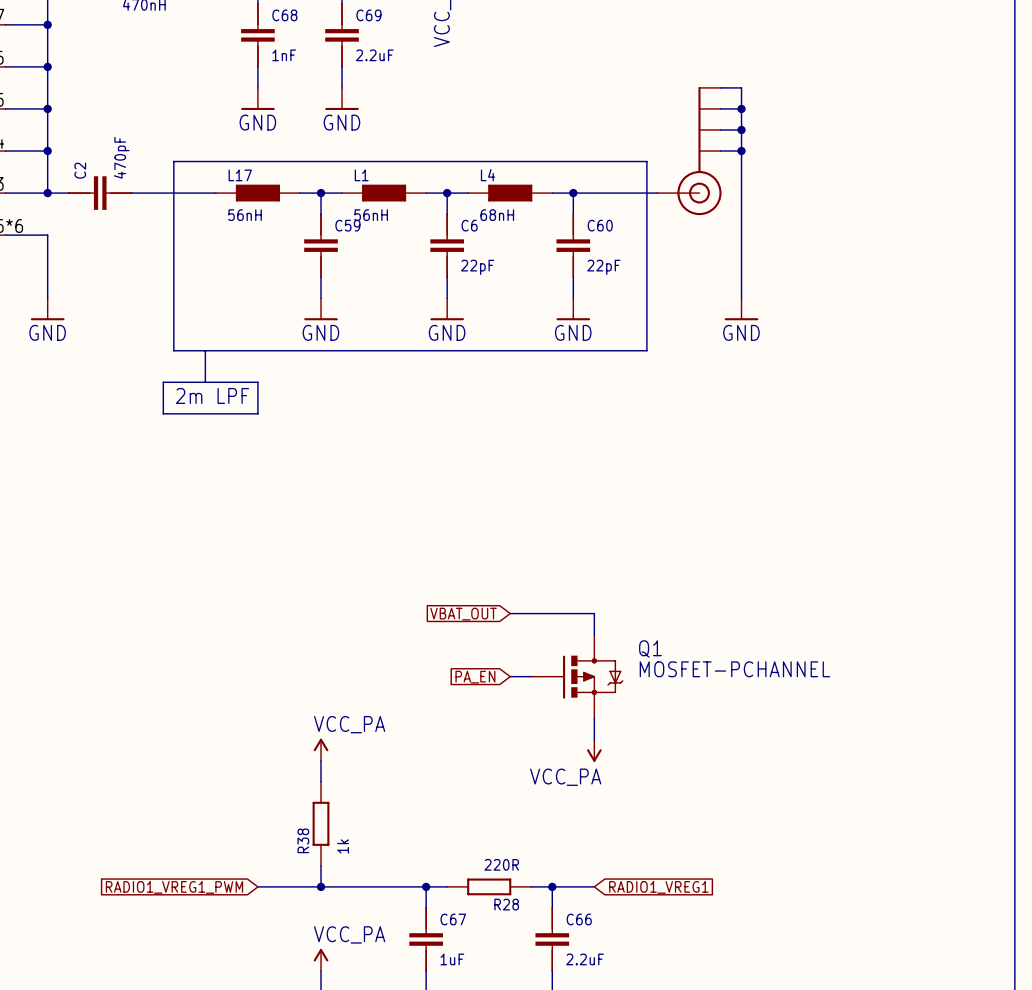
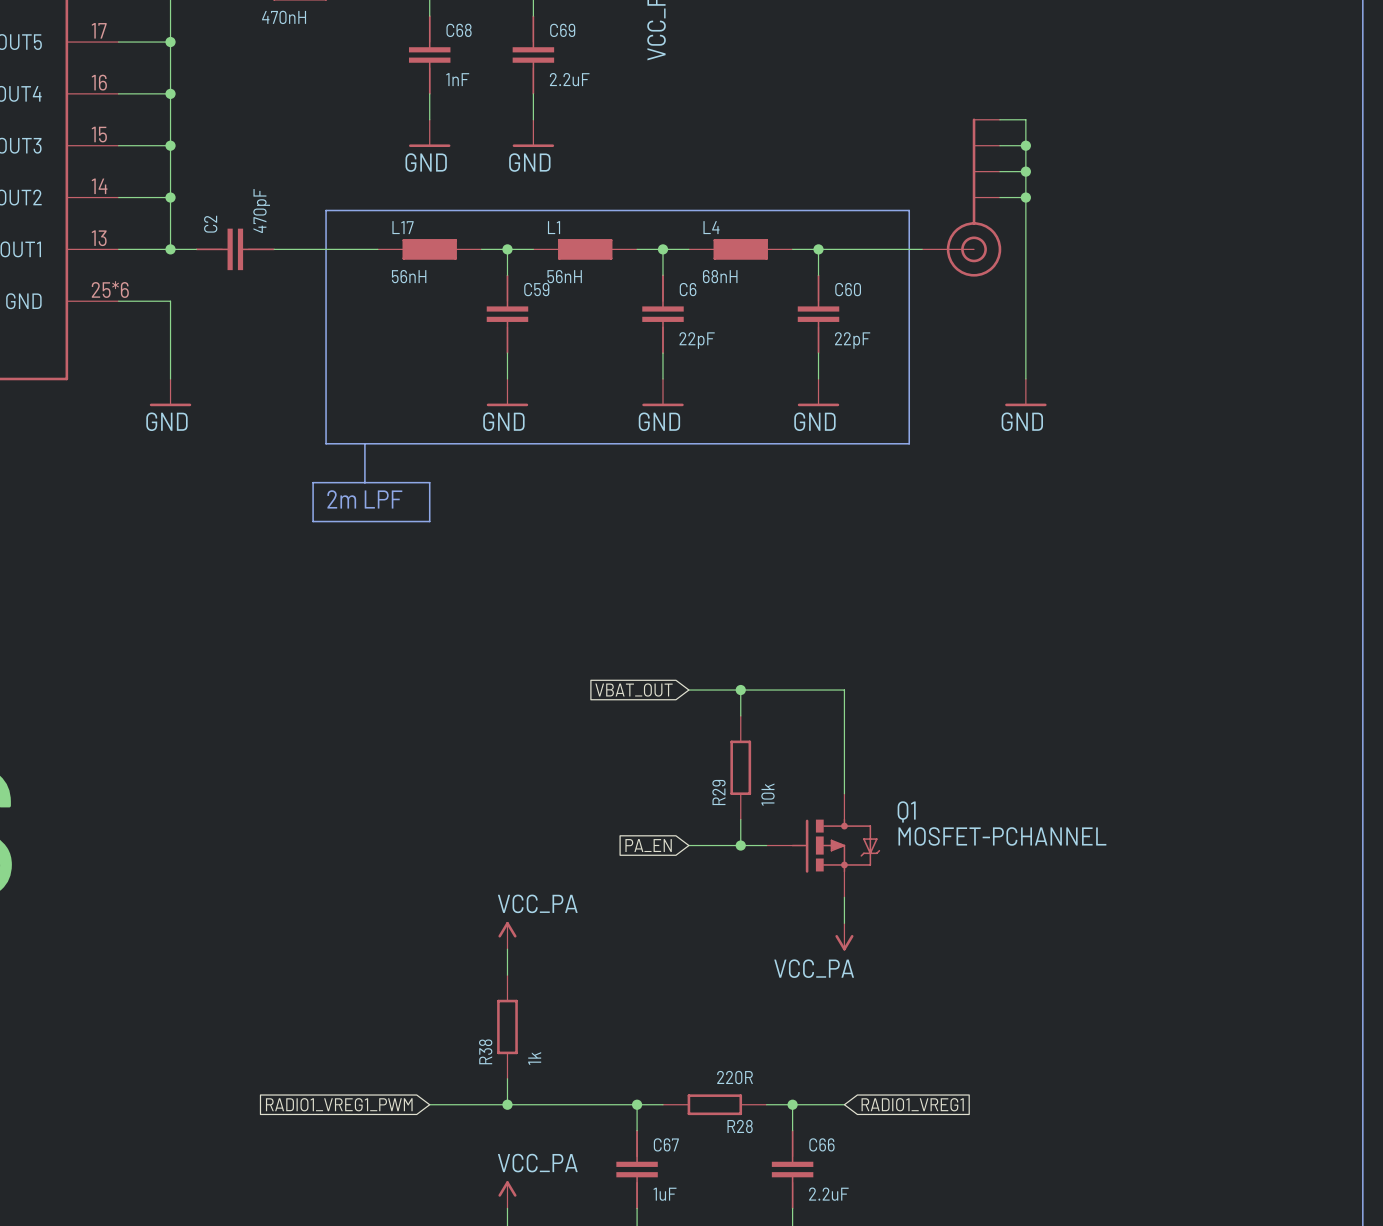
wire: none -> (740, 690) (740, 715)
junction: none -> (740, 690)
wire: (510, 613) (594, 613) -> (688, 690) (844, 690) (844, 767)
R29: none -> 10k (740, 767)
global label position: VBAT_OUT (463, 614) -> VBAT_OUT (634, 690)
wire: none -> (740, 819) (740, 845) (688, 845)
junction: none -> (740, 845)
global label position: PA_EN (475, 677) -> PA_EN (648, 845)

